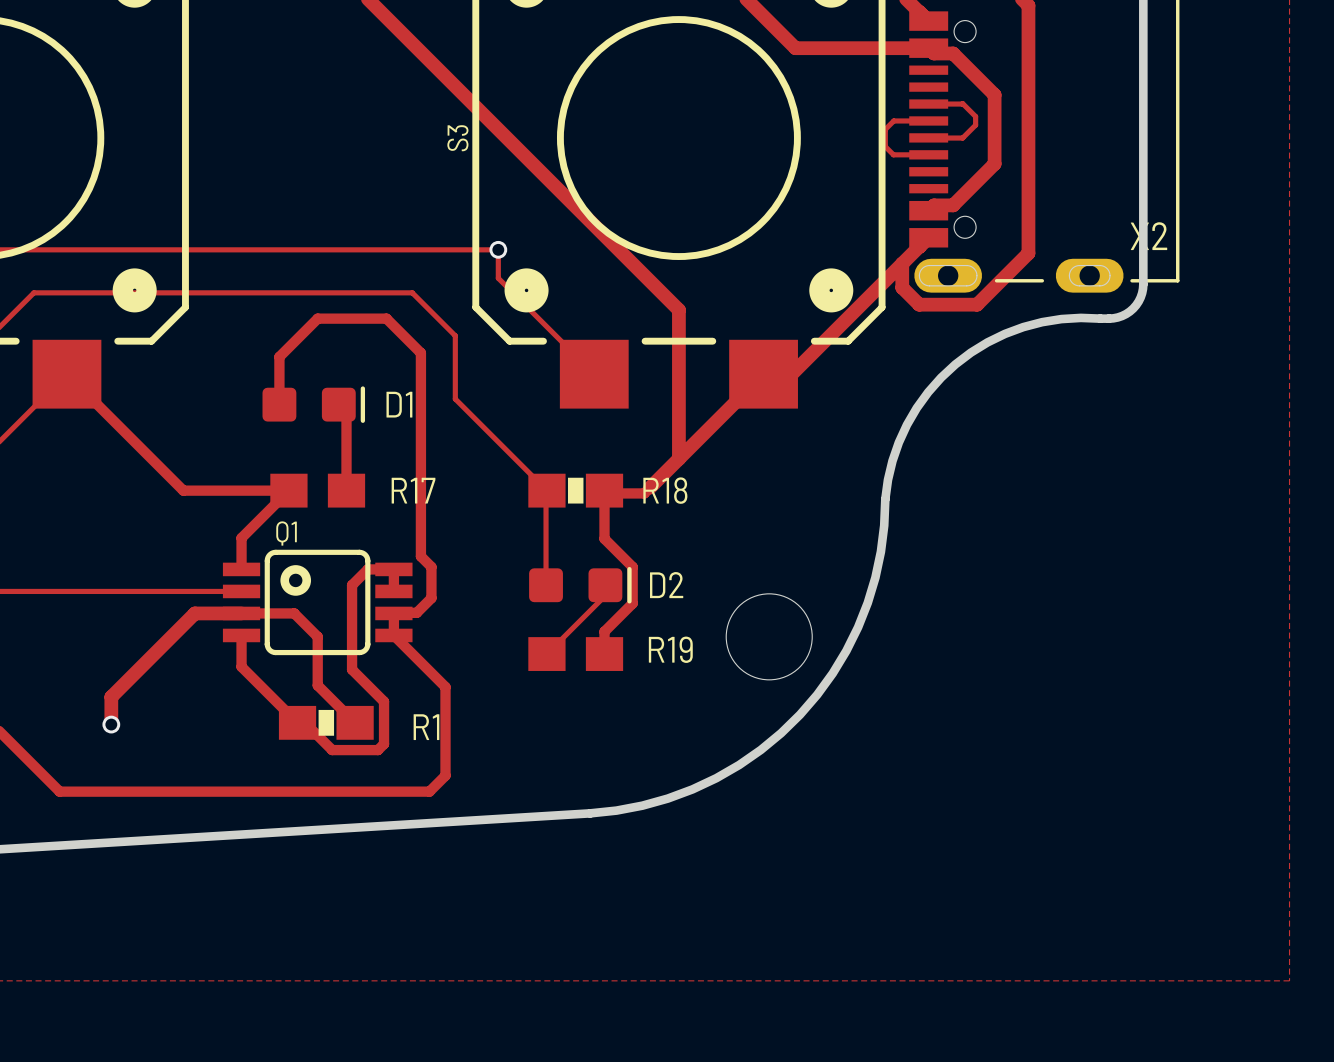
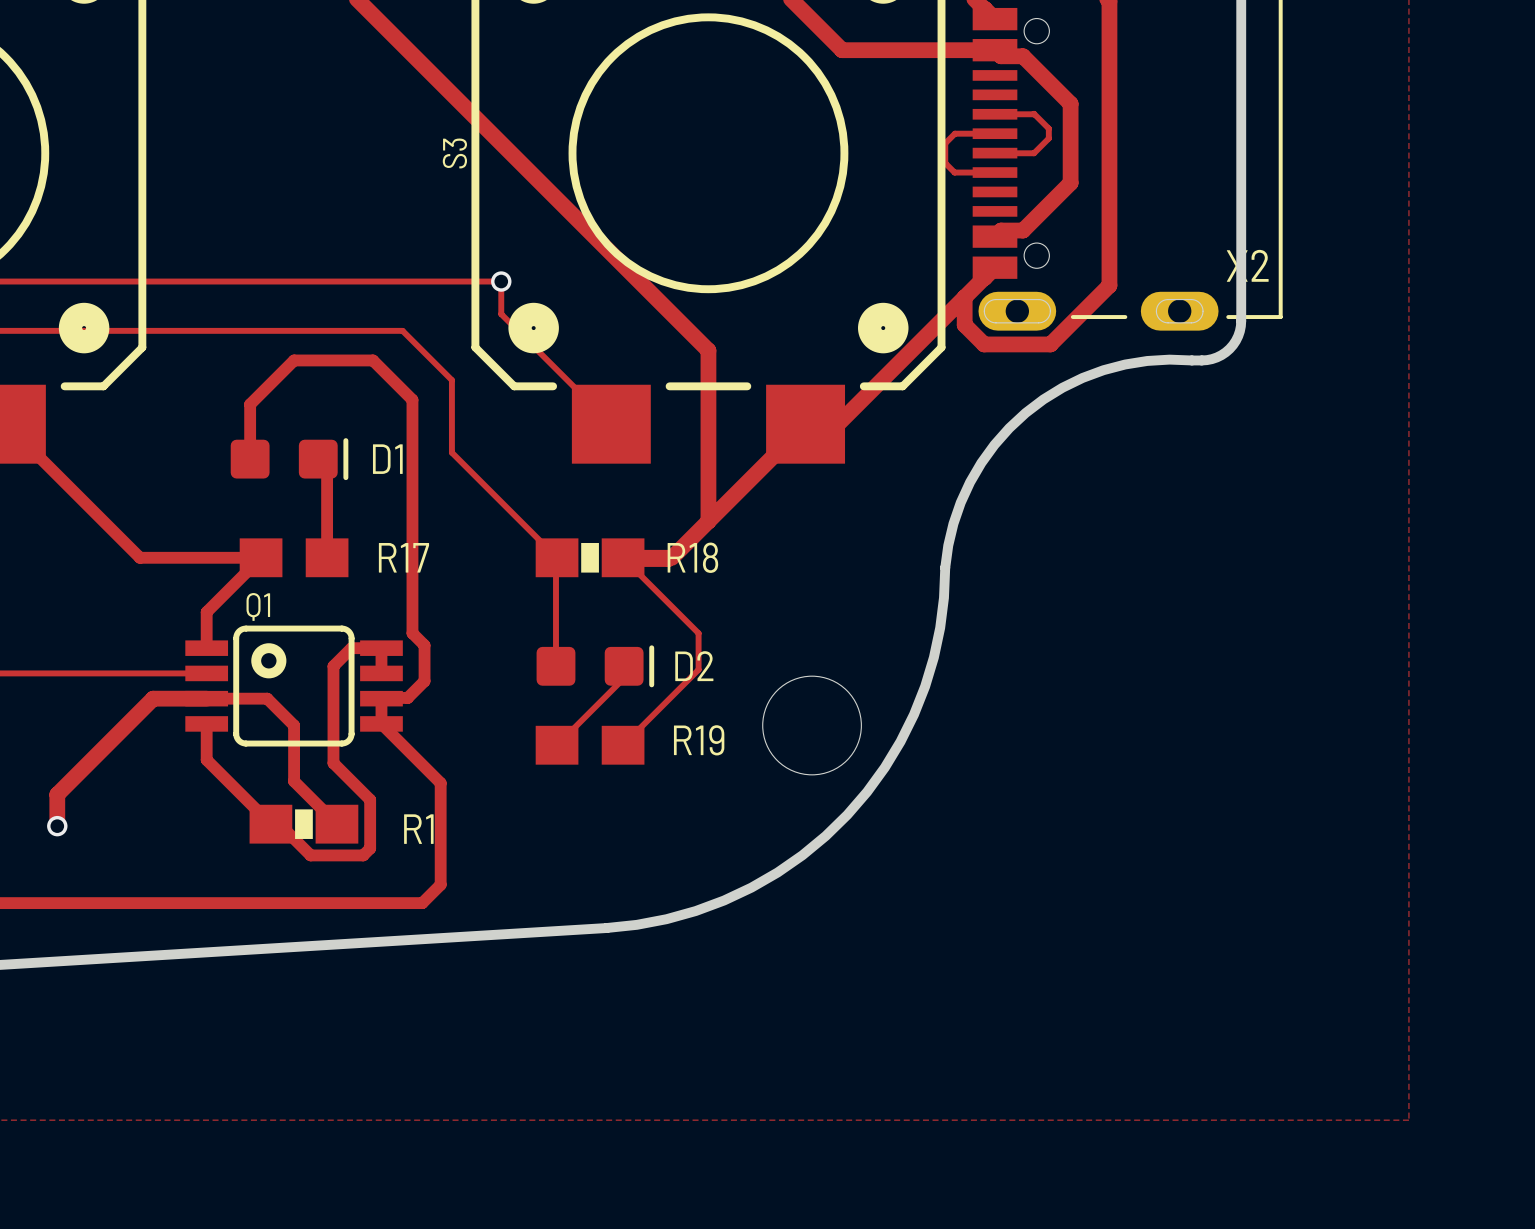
track: (604, 490) (604, 538) (632, 567) (632, 603) (604, 631) (604, 654) -> (671, 557) (623, 557) (698, 633) (698, 669) (623, 745)

